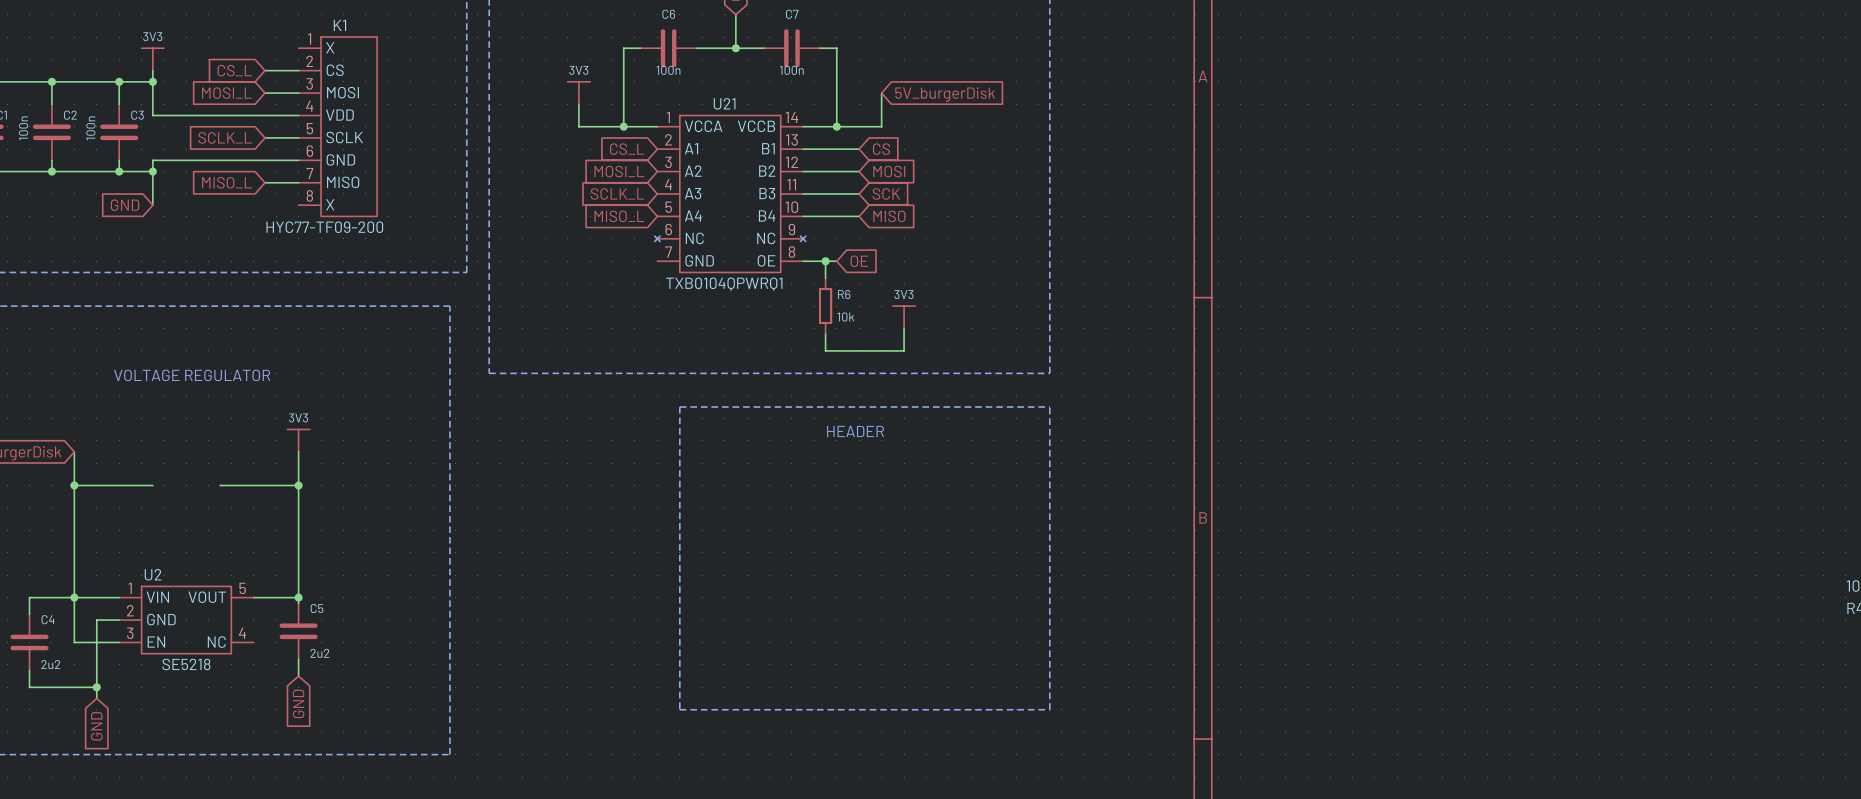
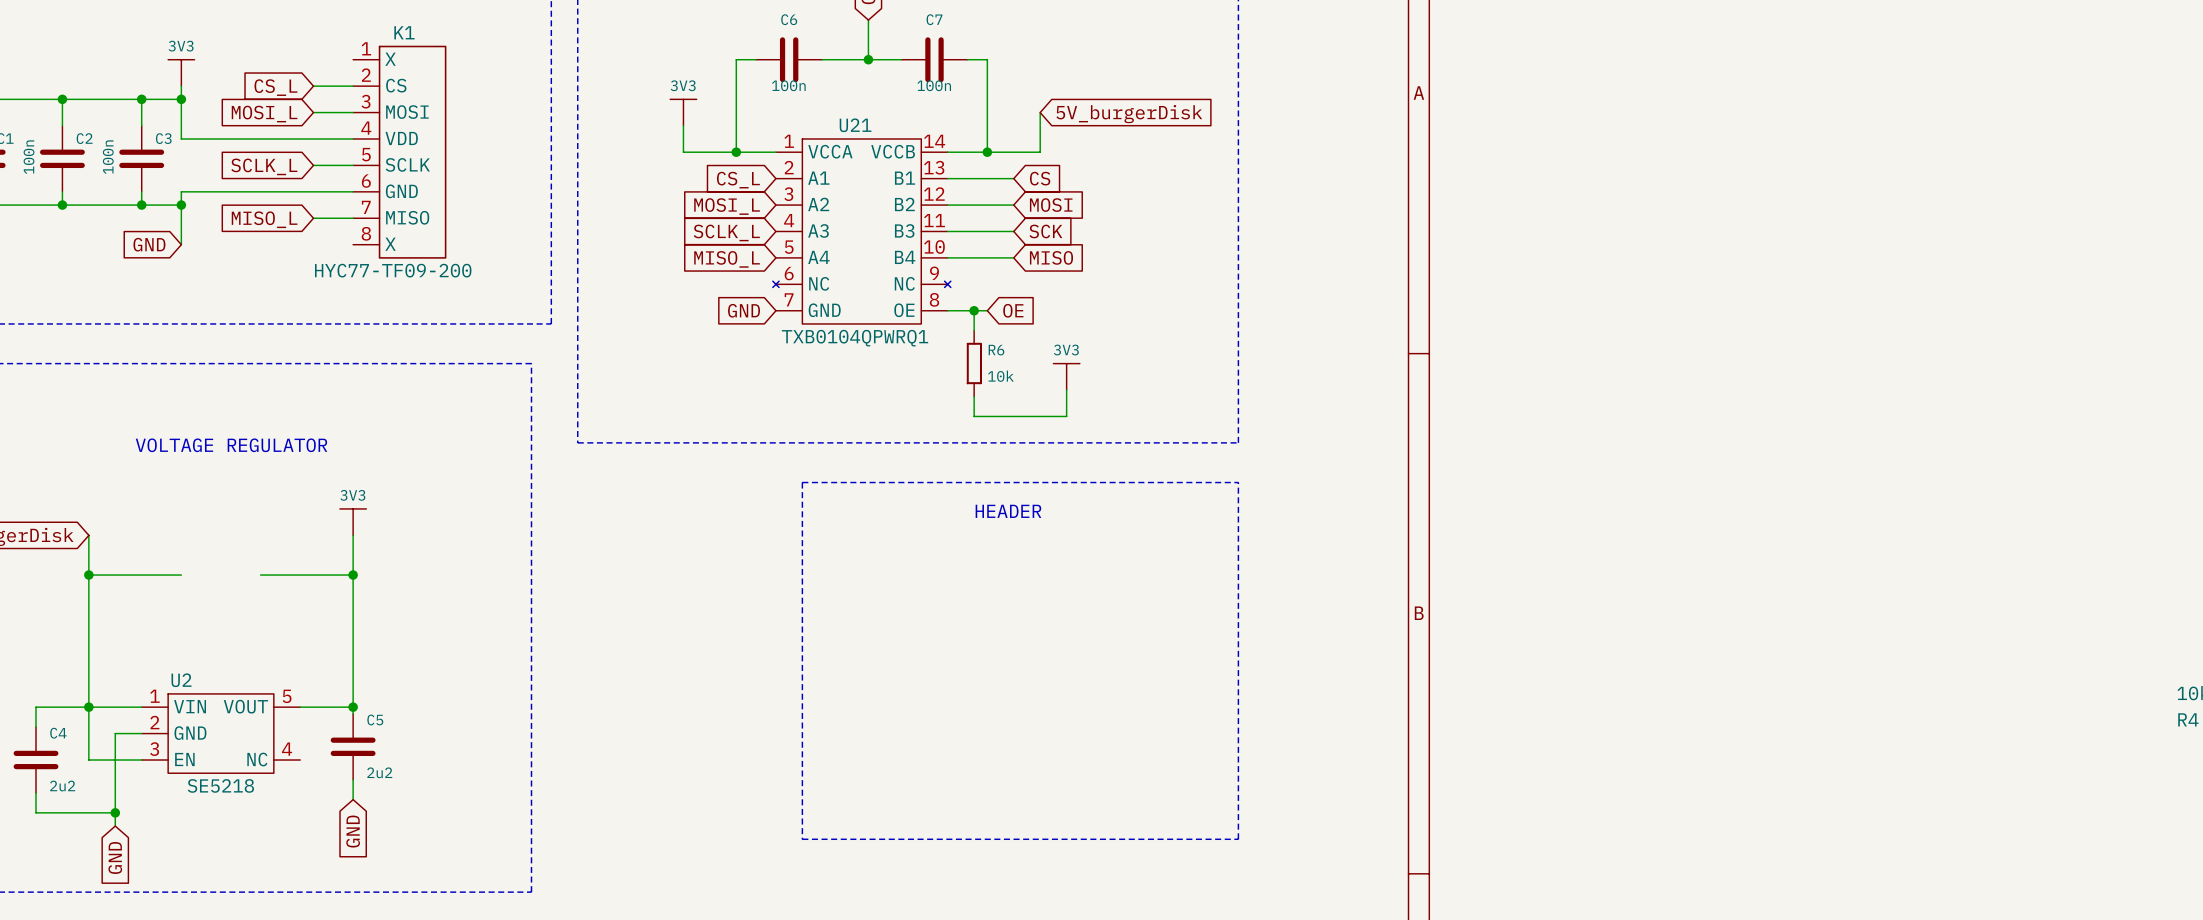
global label: none -> GND (744, 310)

